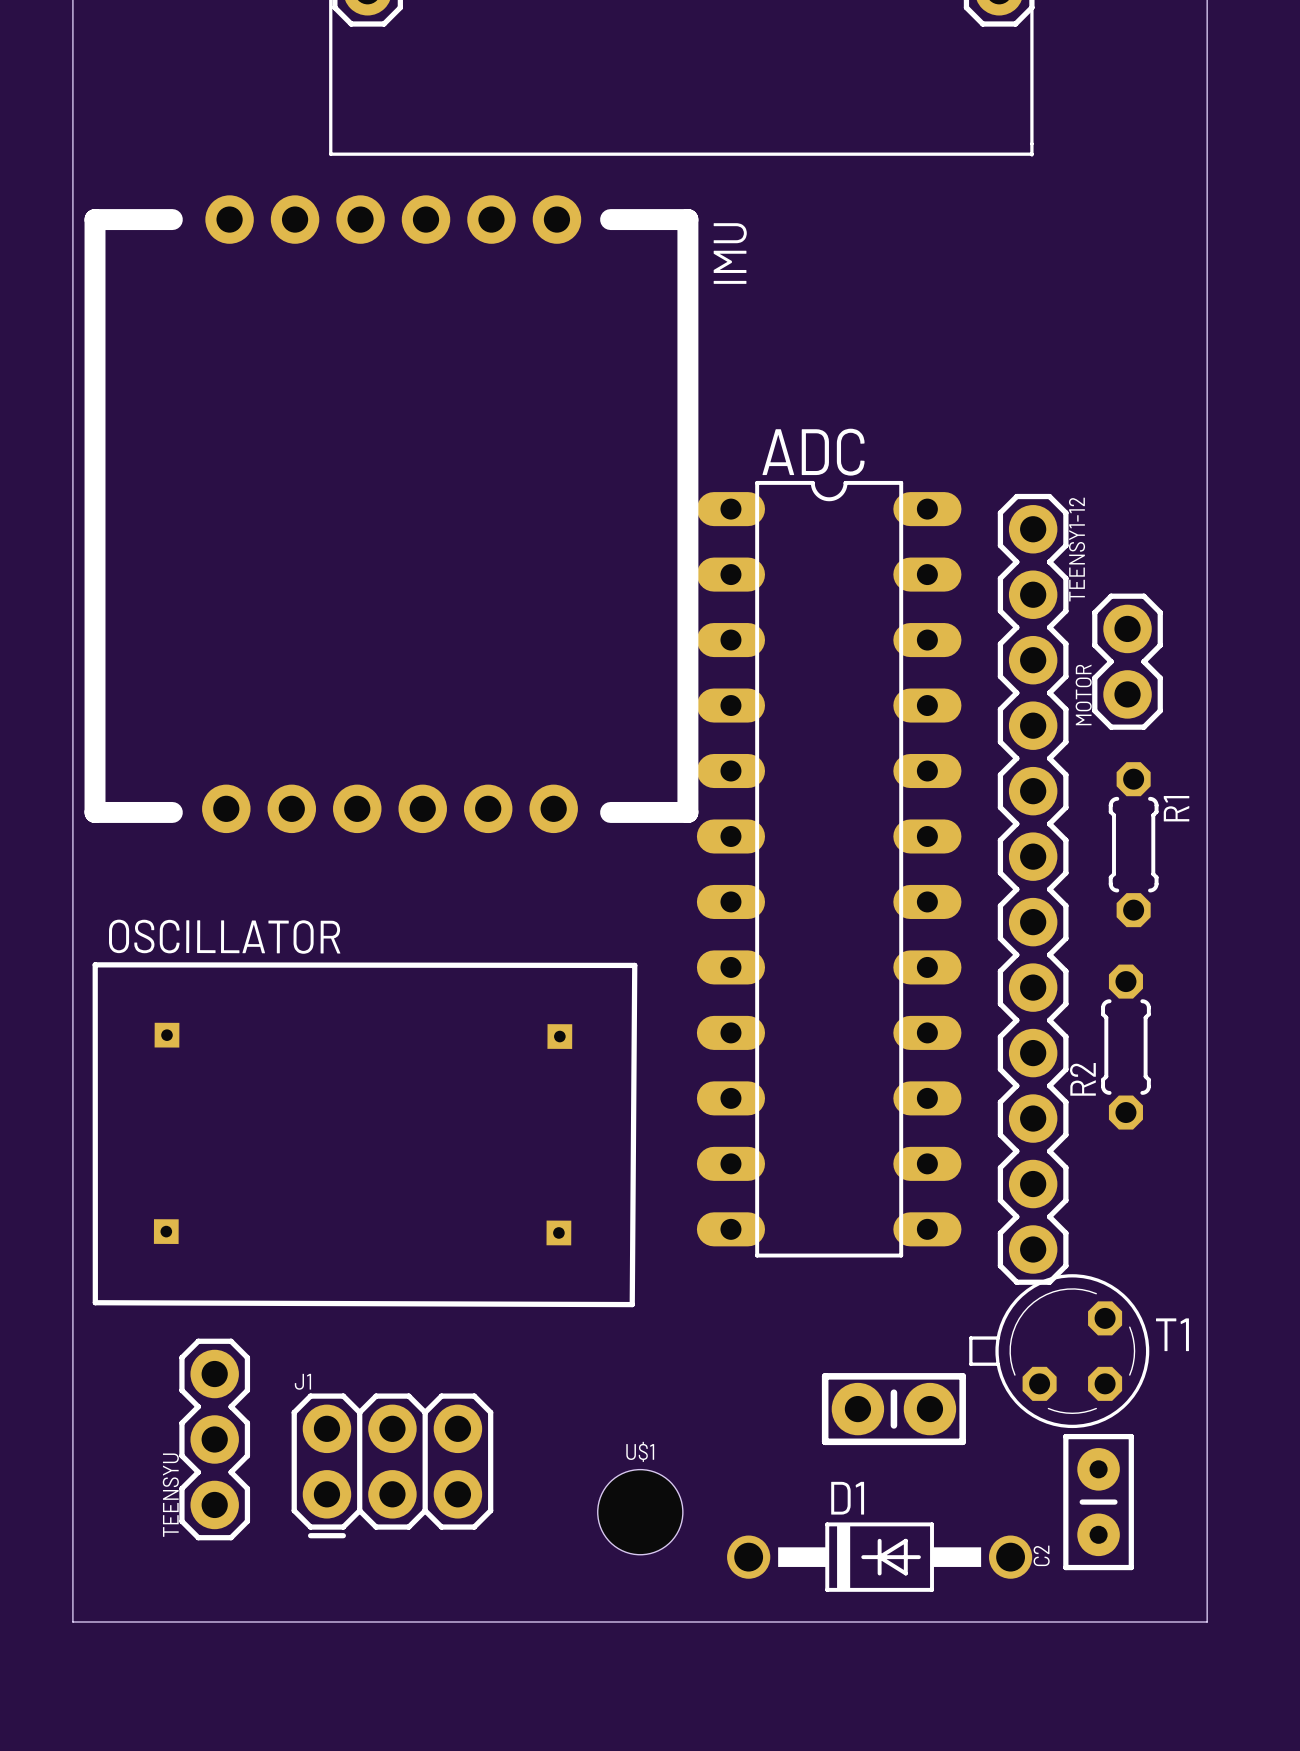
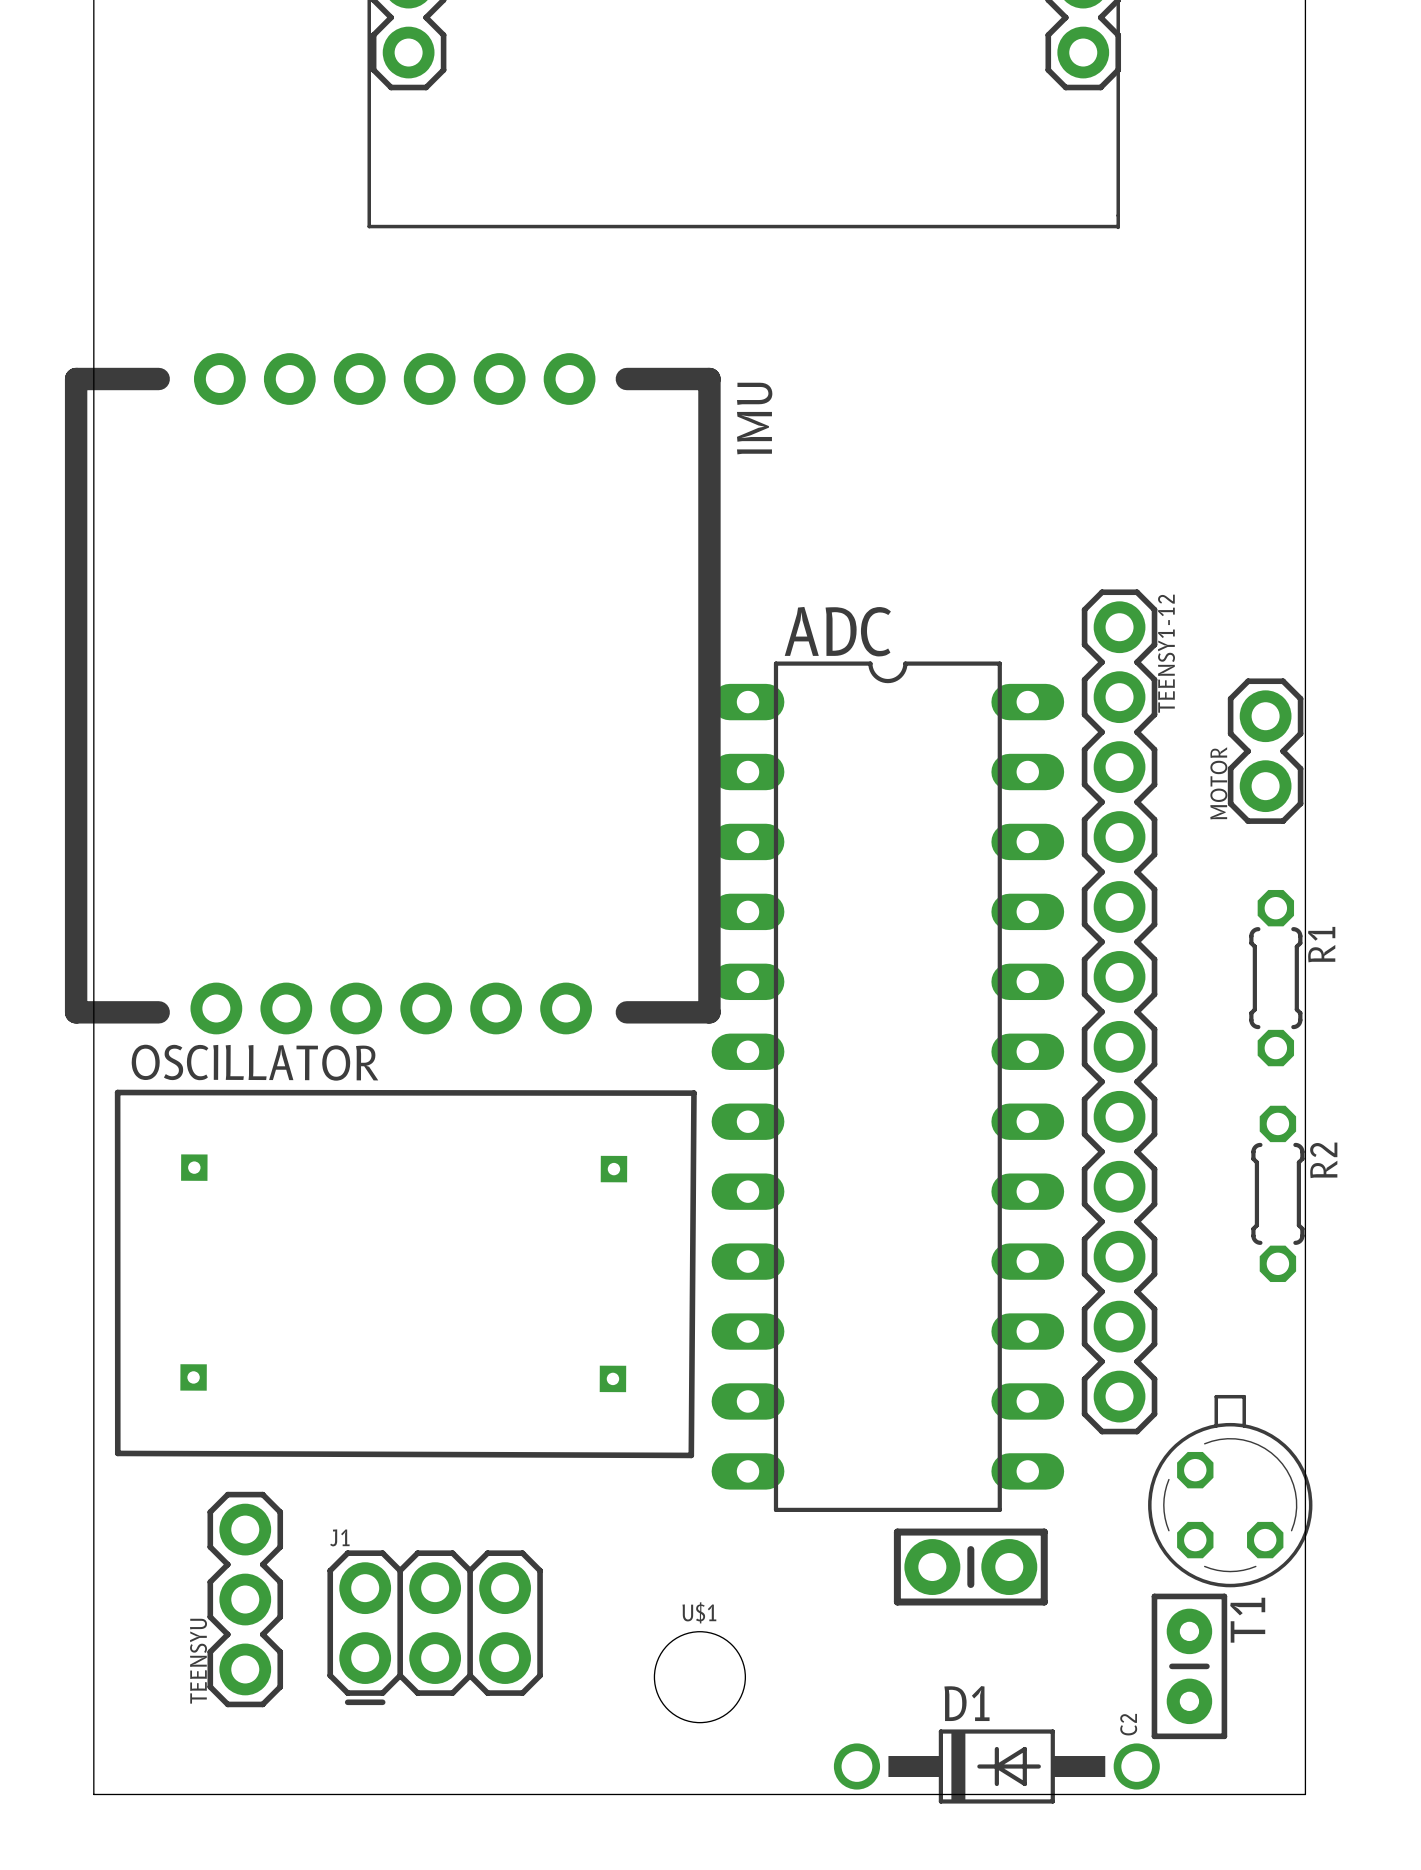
IMU position: (391, 514) -> (392, 693)
MOTOR position: (1127, 661) -> (1265, 751)
R1 position: (1133, 844) -> (1275, 978)
ADC: (829, 869) -> none
ADC: none -> (887, 1086)
R2 position: (1125, 1047) -> (1277, 1193)
R2 name position: R2 (1082, 1079) -> R2 (1323, 1160)
T1 rotation: 0° (1059, 1351) -> 90° clockwise (1230, 1491)
D1 position: (879, 1557) -> (996, 1766)

